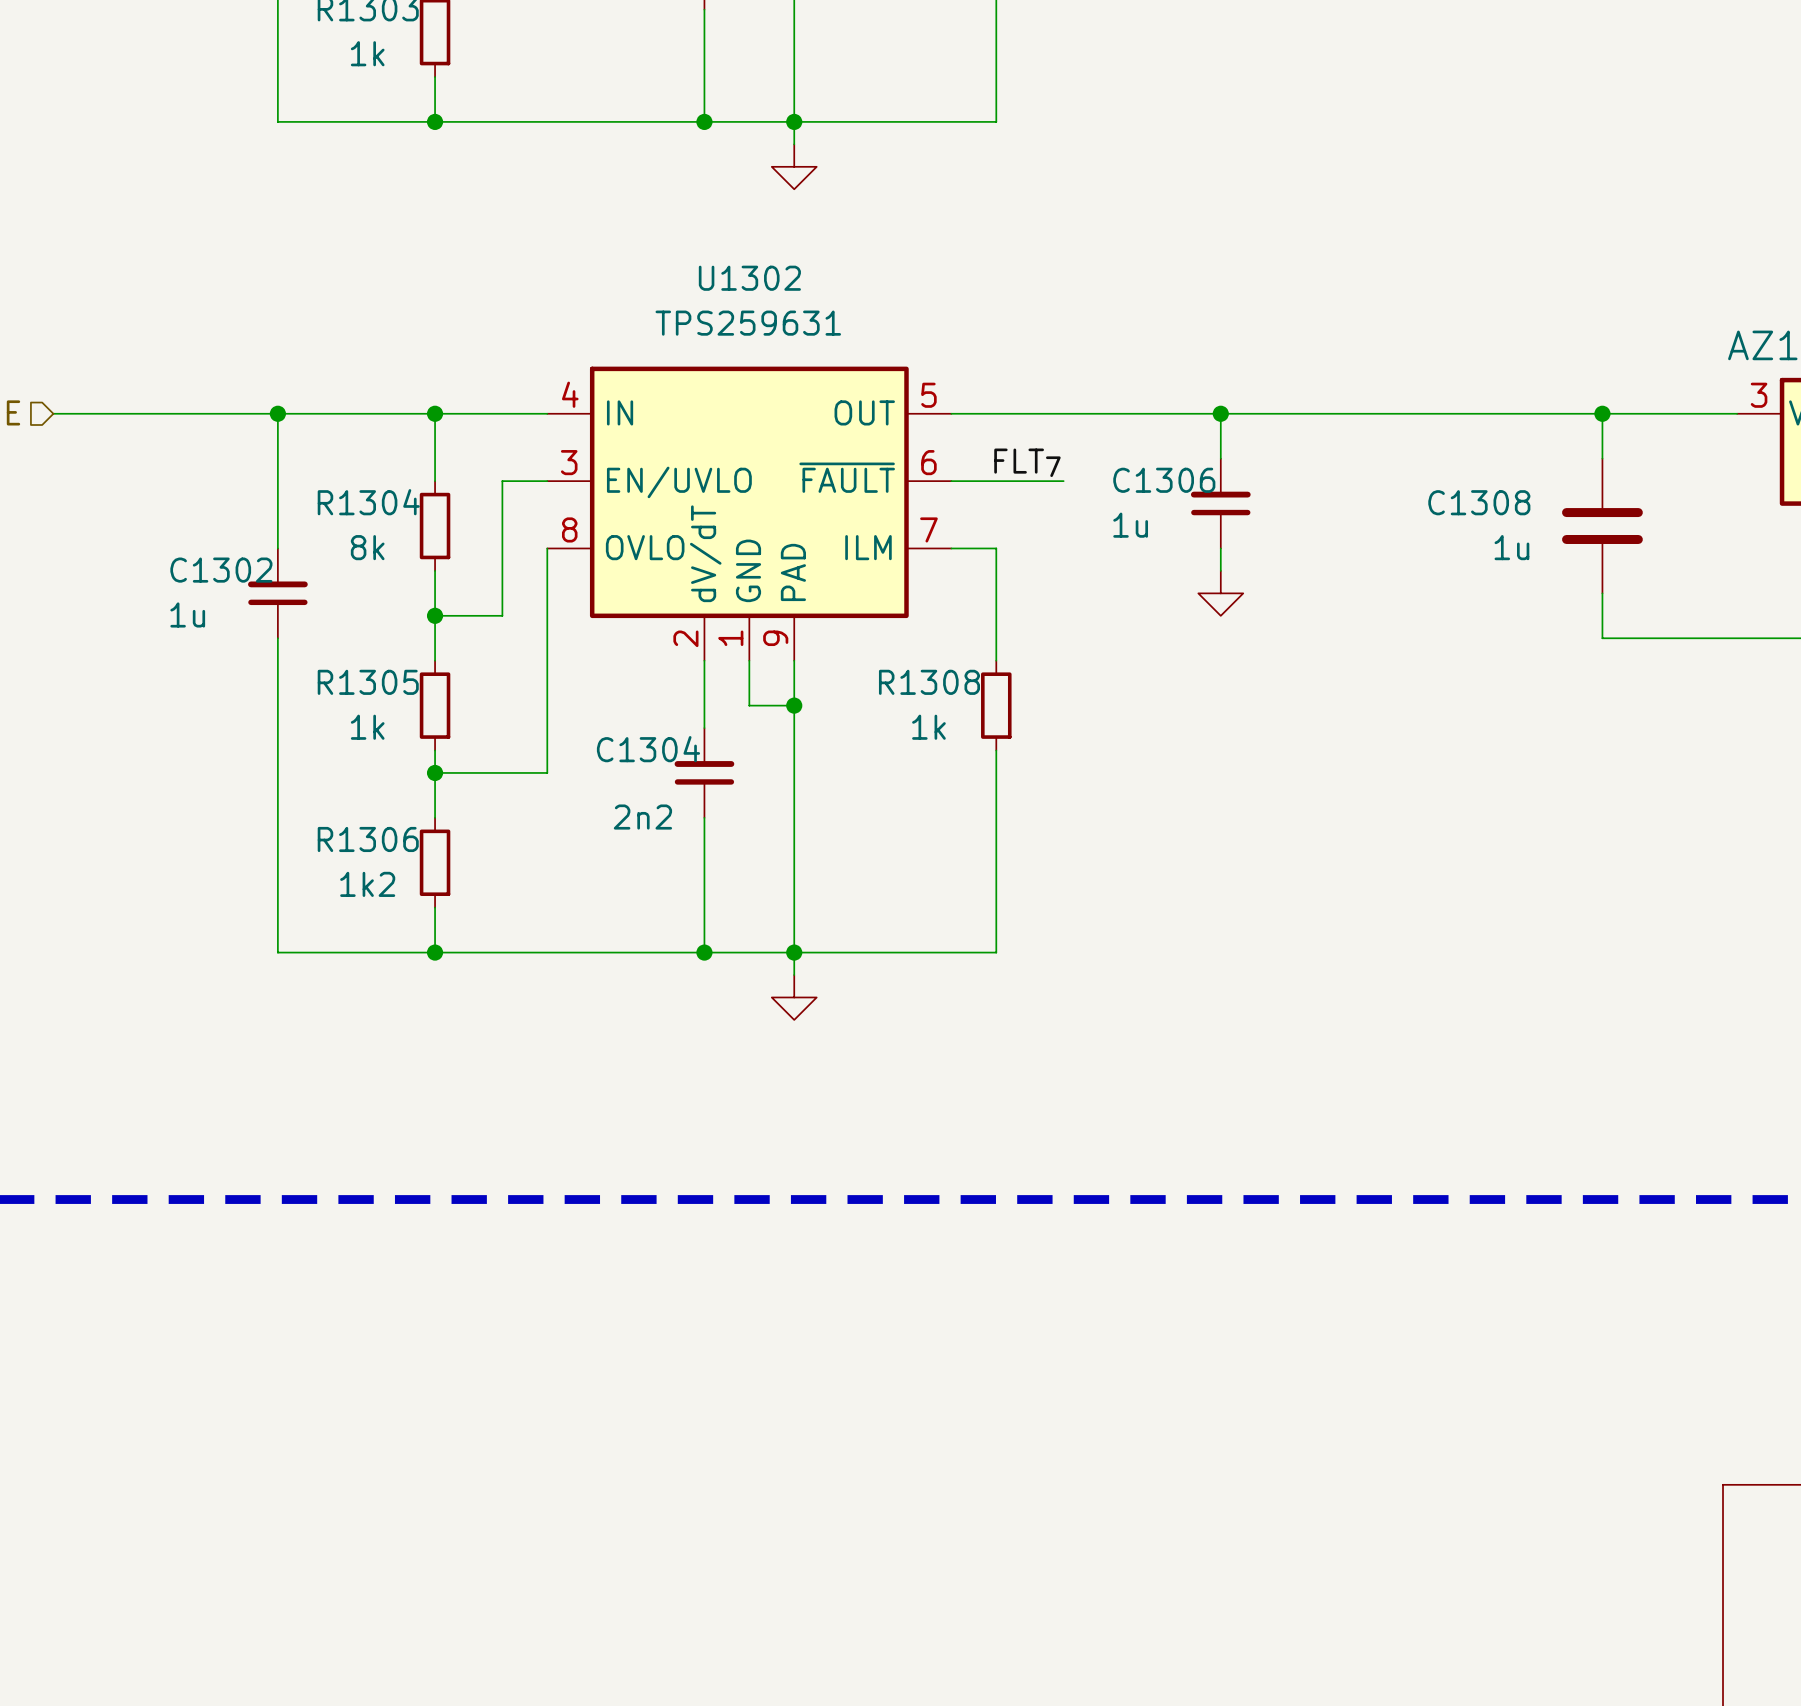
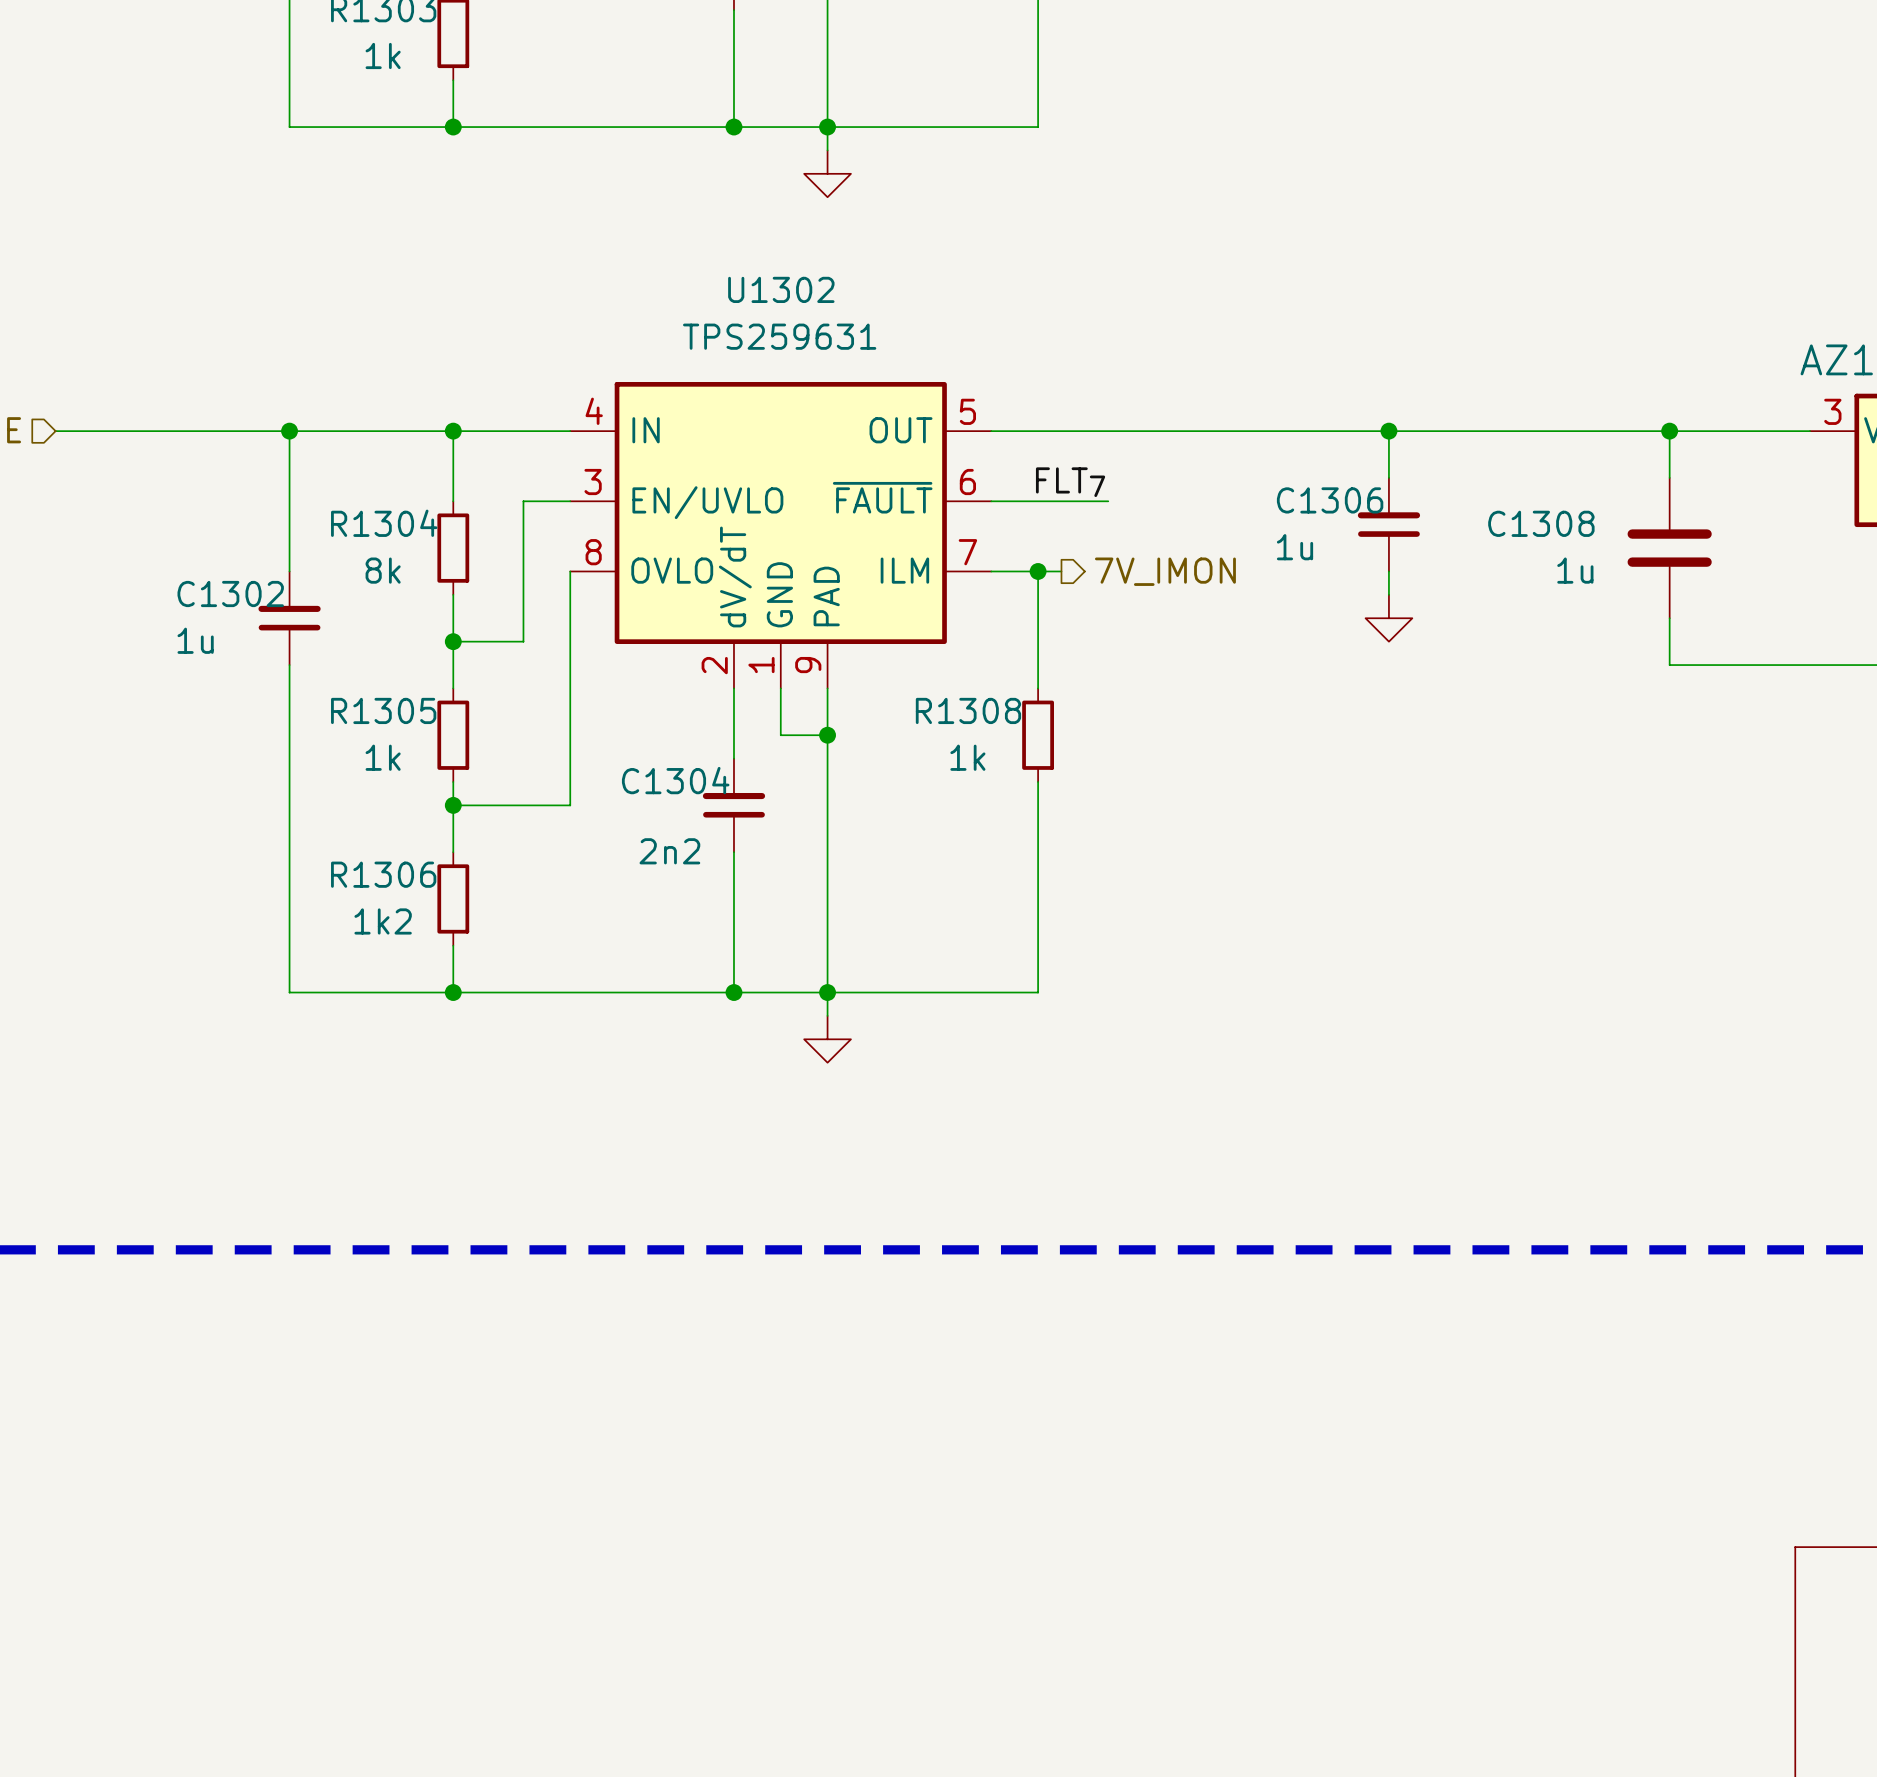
wire: (1220, 413) (1220, 458) -> (1388, 431) (1388, 477)
junction: (1220, 413) -> none
junction: none -> (1388, 431)
C1306 position: (1220, 503) -> (1388, 524)
wire: none -> (1038, 571) (1061, 571)
junction: none -> (1038, 571)
hierarchical label: none -> 7V_IMON (1165, 571)
wire: (1220, 548) (1220, 570) -> (1388, 571) (1388, 594)
power symbol position: (1220, 593) -> (1388, 618)

